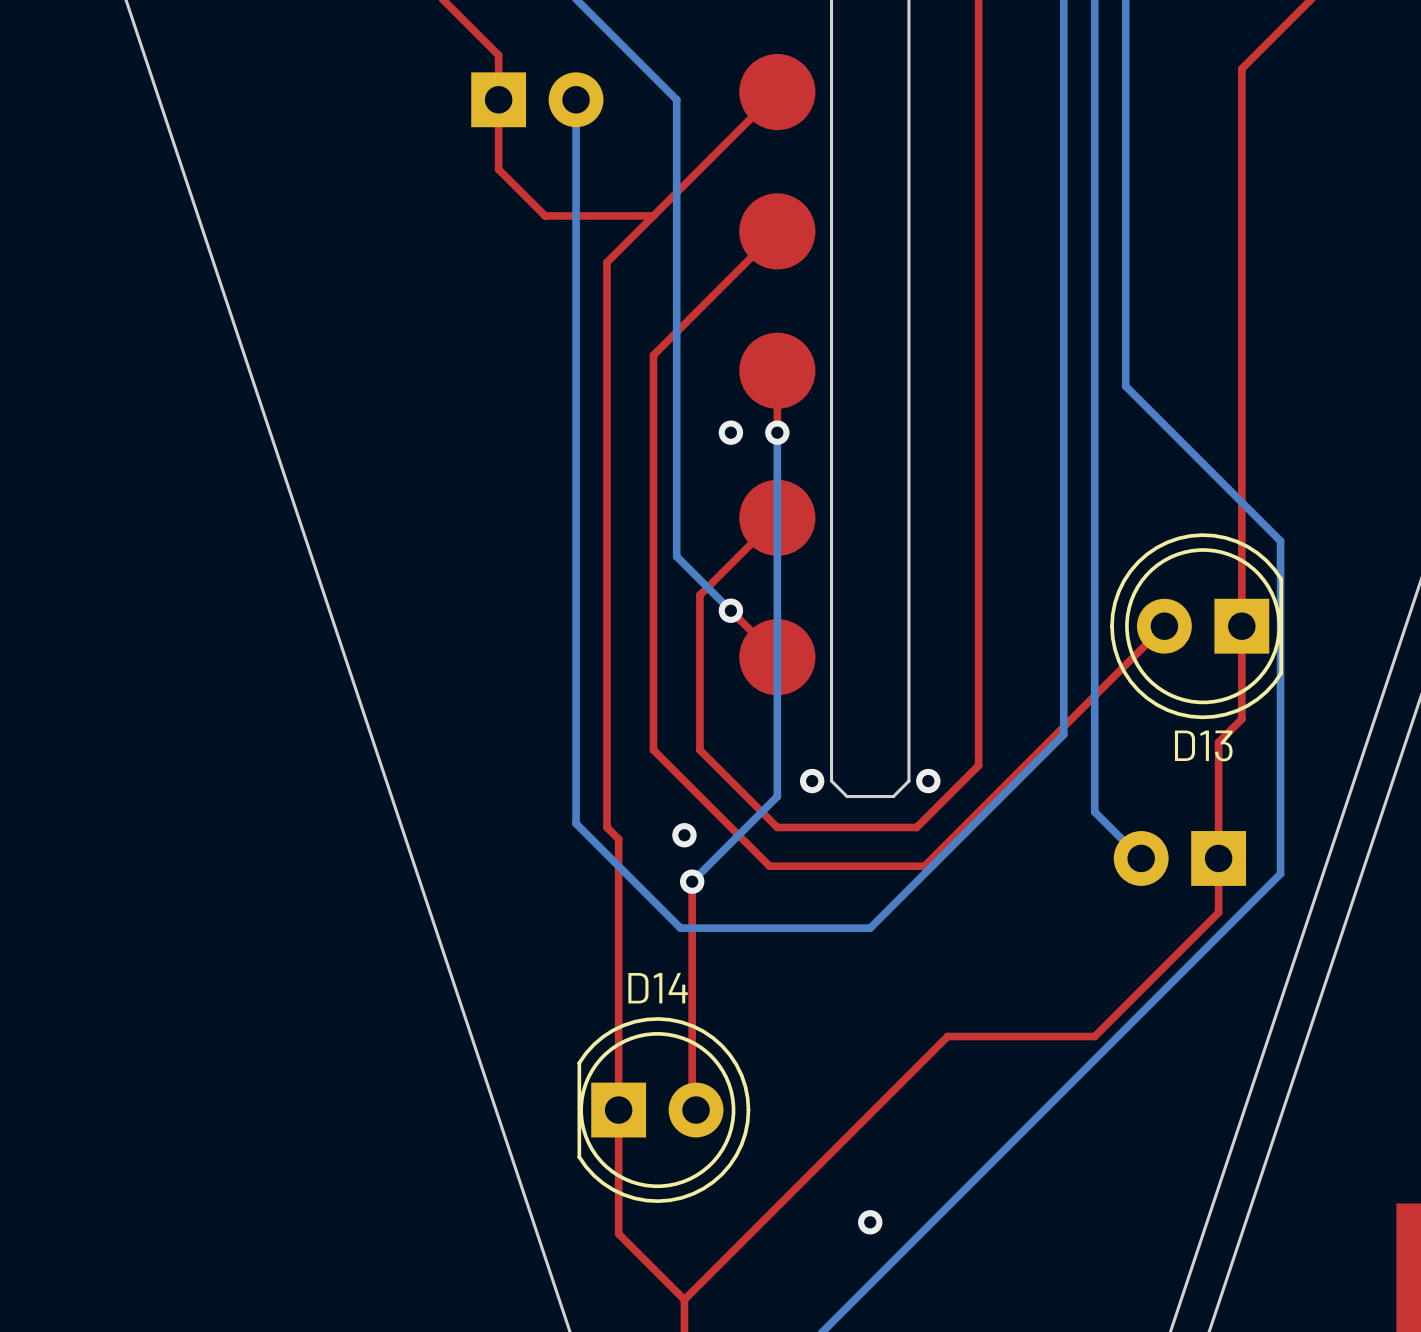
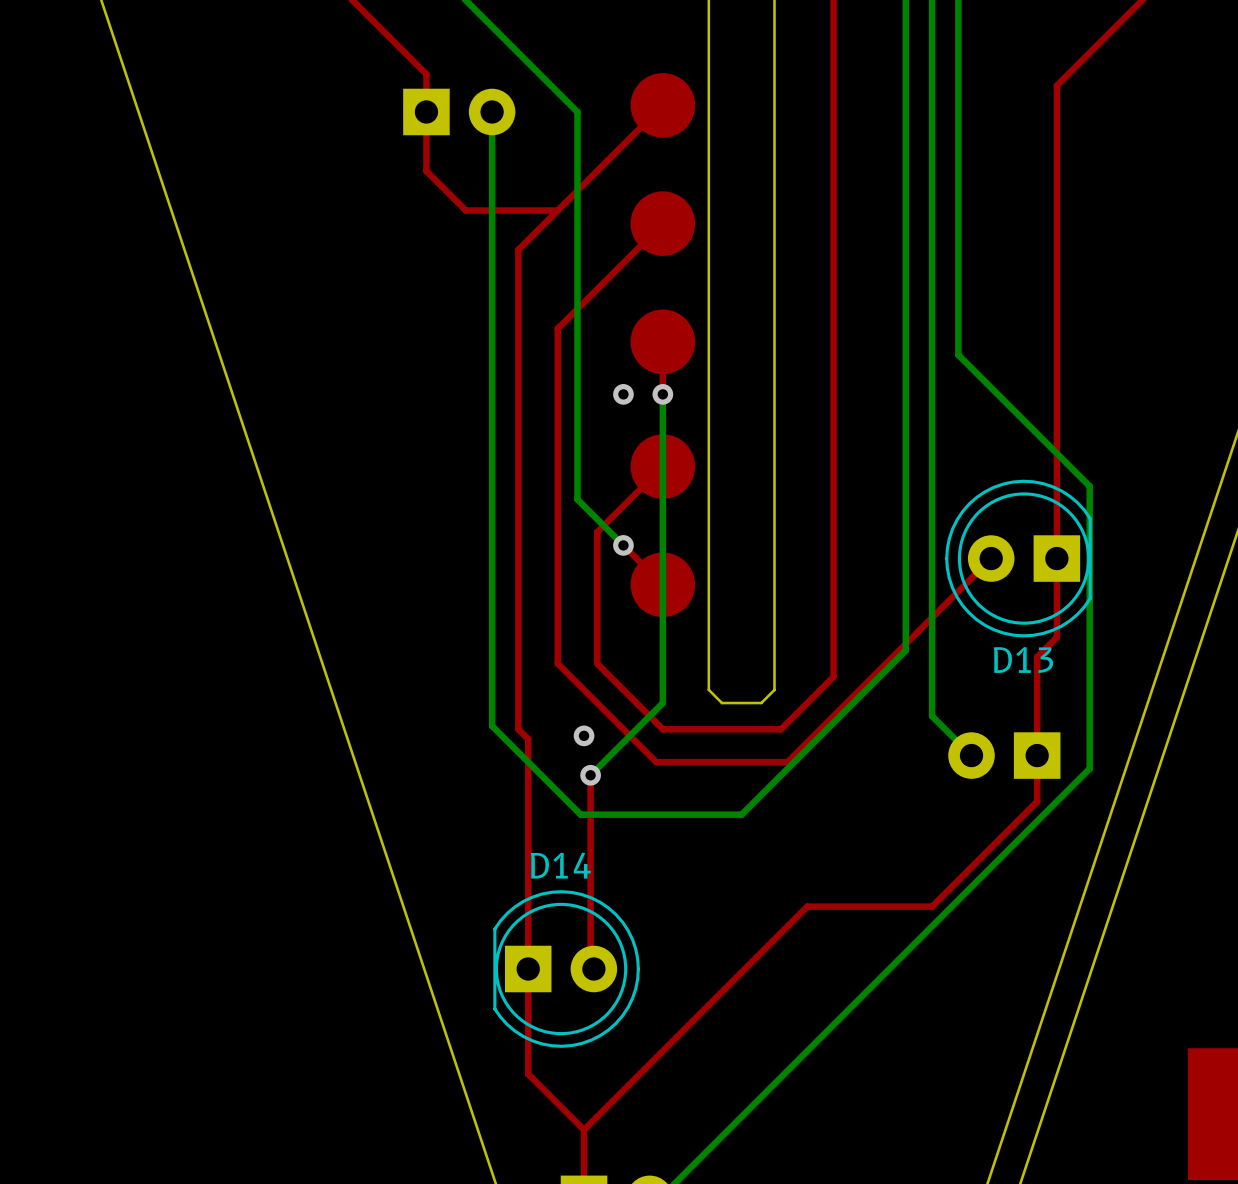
via: (812, 781) -> none
via: (928, 781) -> none
via: (870, 1222) -> none

